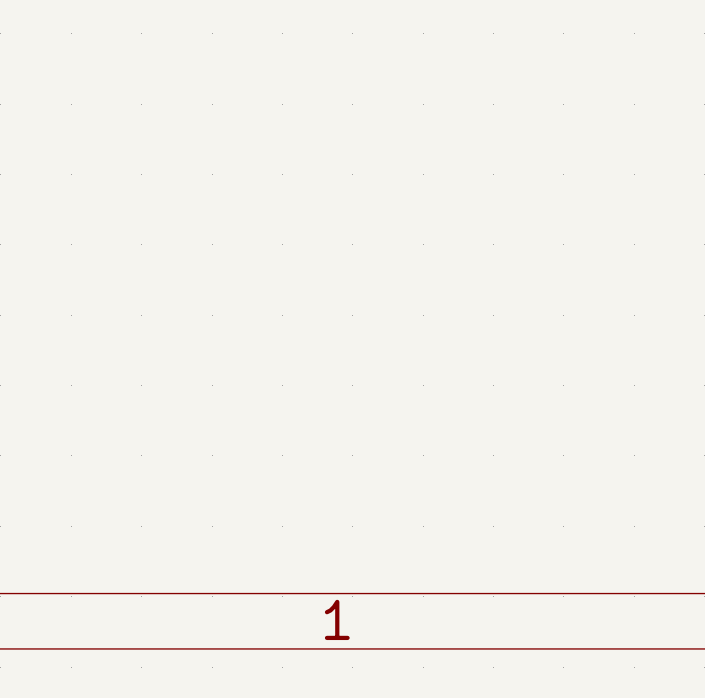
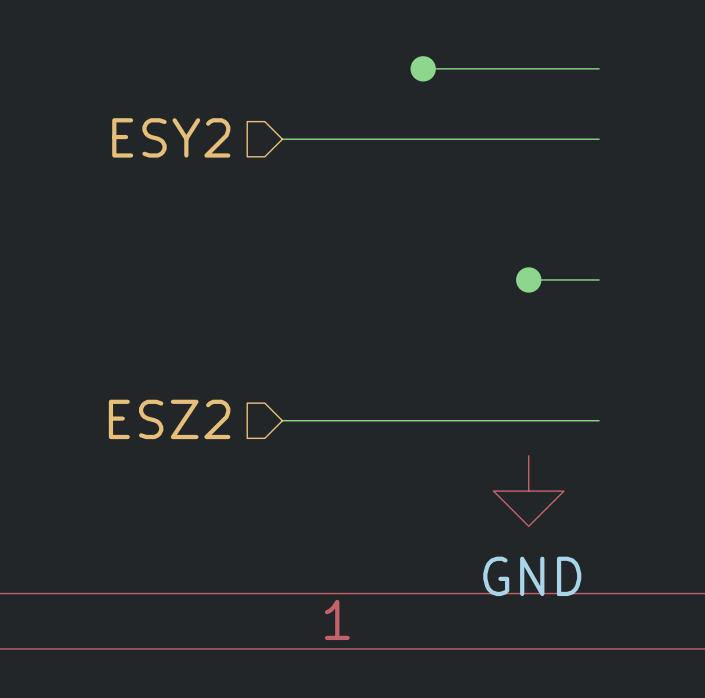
wire: none -> (423, 68) (599, 68)
junction: none -> (423, 68)
hierarchical label: none -> ESY2 (171, 137)
wire: none -> (282, 139) (599, 139)
wire: none -> (528, 279) (599, 279)
junction: none -> (528, 279)
hierarchical label: none -> ESZ2 (169, 419)
wire: none -> (282, 420) (599, 420)
power symbol: none -> GND (528, 491)

